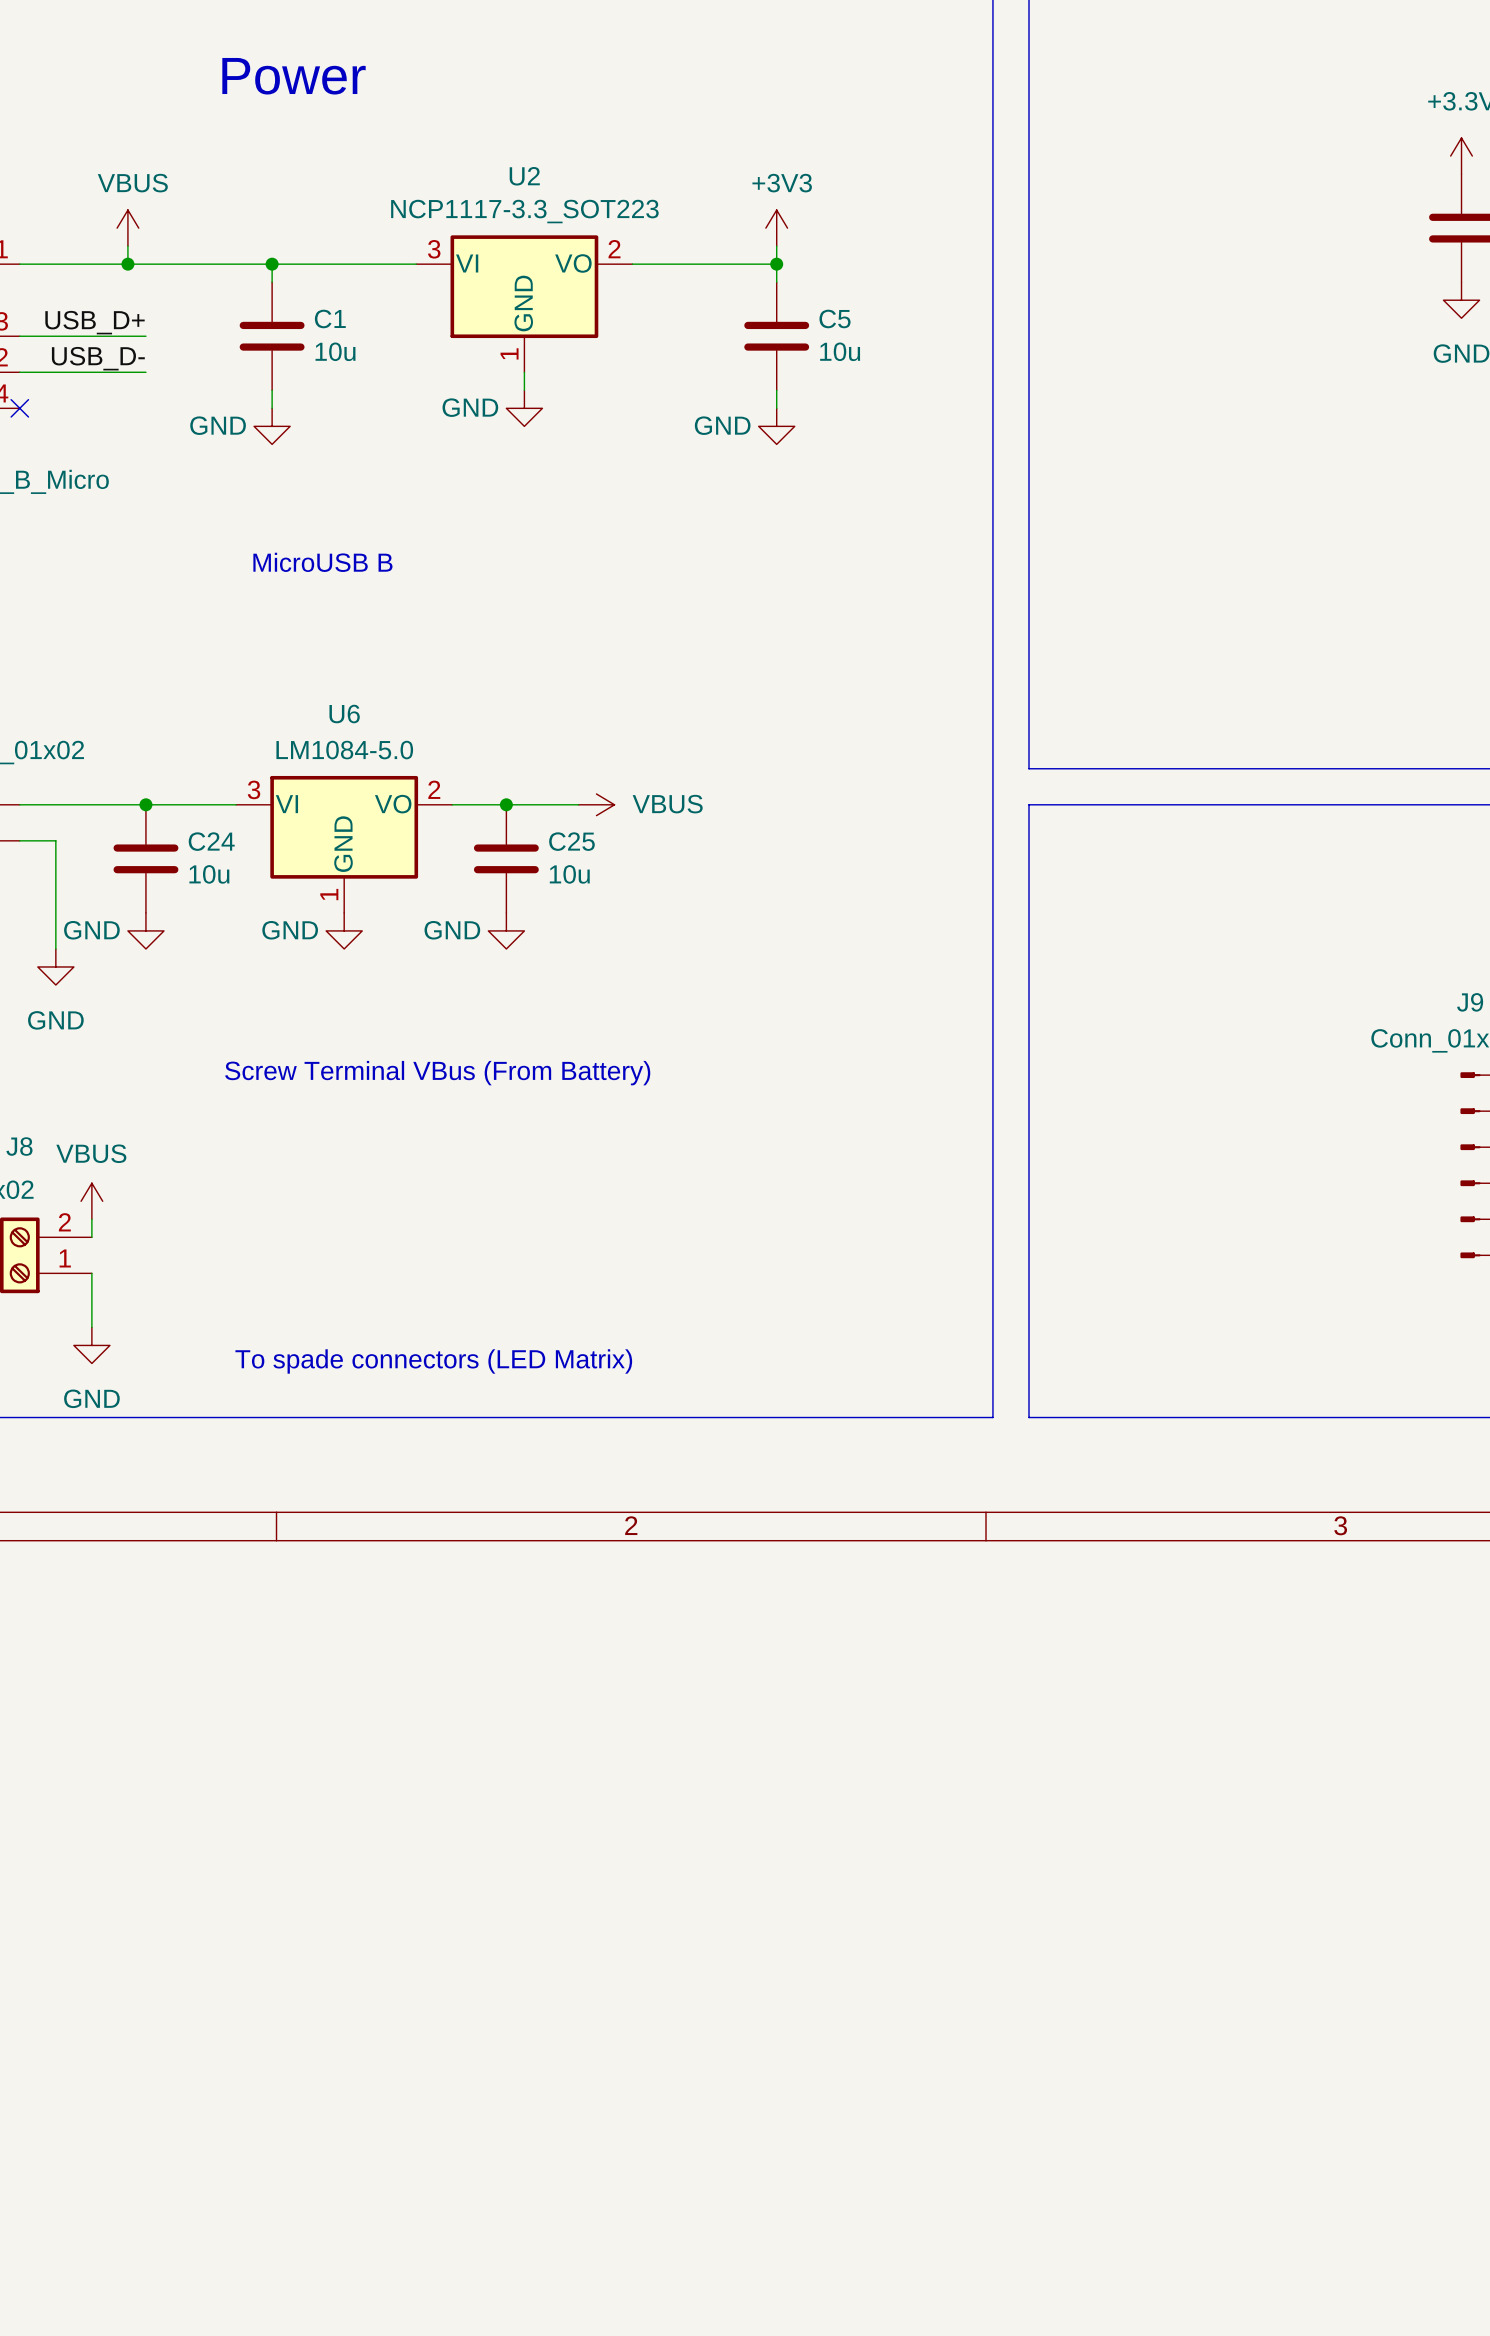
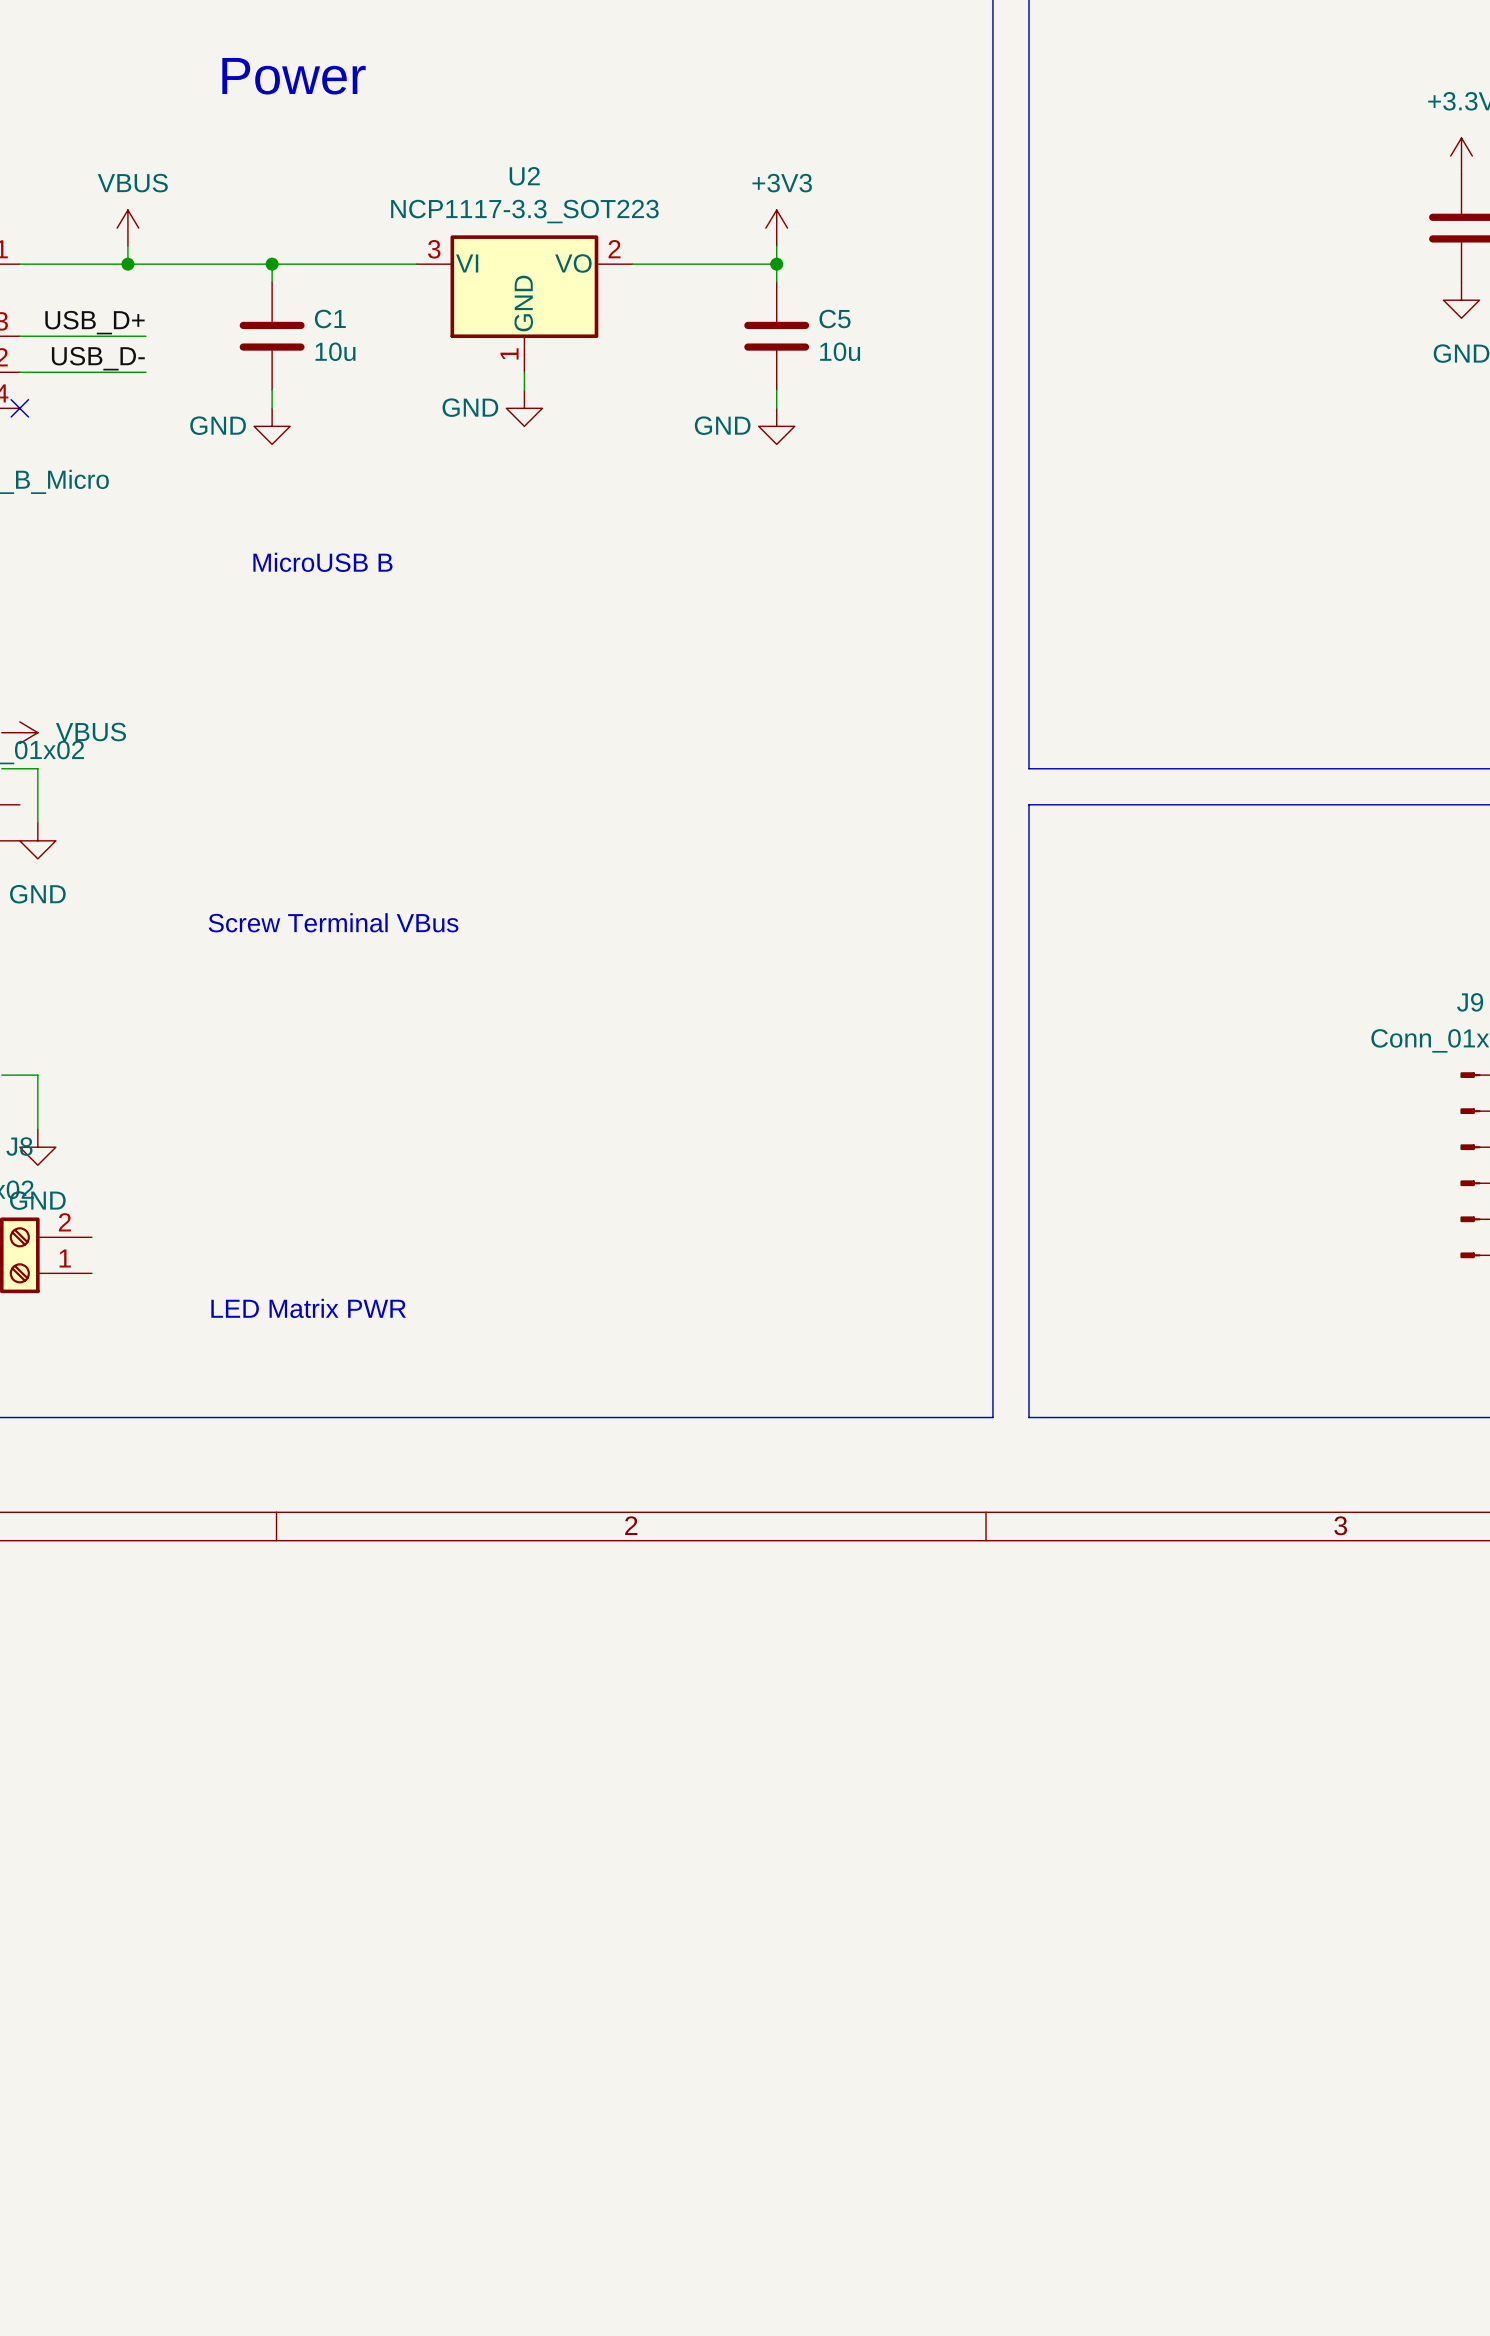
power symbol: none -> VBUS (19, 732)
wire: none -> (1, 768) (37, 768) (37, 822)
wire: (19, 804) (236, 804) -> none
junction: (145, 804) -> none
wire: (452, 804) (578, 804) -> none
junction: (506, 804) -> none
power symbol: VBUS (596, 804) -> none
wire: (19, 840) (55, 840) (55, 948) -> none
power symbol: none -> GND (37, 840)
U6: LM1084-5.0 (344, 844) -> none
C24: 10u (145, 858) -> none
C25: 10u (506, 858) -> none
text: none -> Screw Terminal VBus (333, 922)
power symbol: GND (145, 930) -> none
power symbol: GND (344, 930) -> none
power symbol: GND (506, 930) -> none
power symbol: GND (55, 966) -> none
text: Screw Terminal VBus (From Battery) (437, 1073) -> none
wire: none -> (1, 1075) (37, 1075) (37, 1129)
power symbol: none -> GND (37, 1147)
power symbol: VBUS (91, 1201) -> none
wire: (91, 1219) (91, 1237) -> none
wire: (91, 1273) (91, 1327) -> none
text: none -> LED Matrix PWR (308, 1308)
power symbol: GND (91, 1345) -> none
text: To spade connectors (LED Matrix) (433, 1361) -> none

